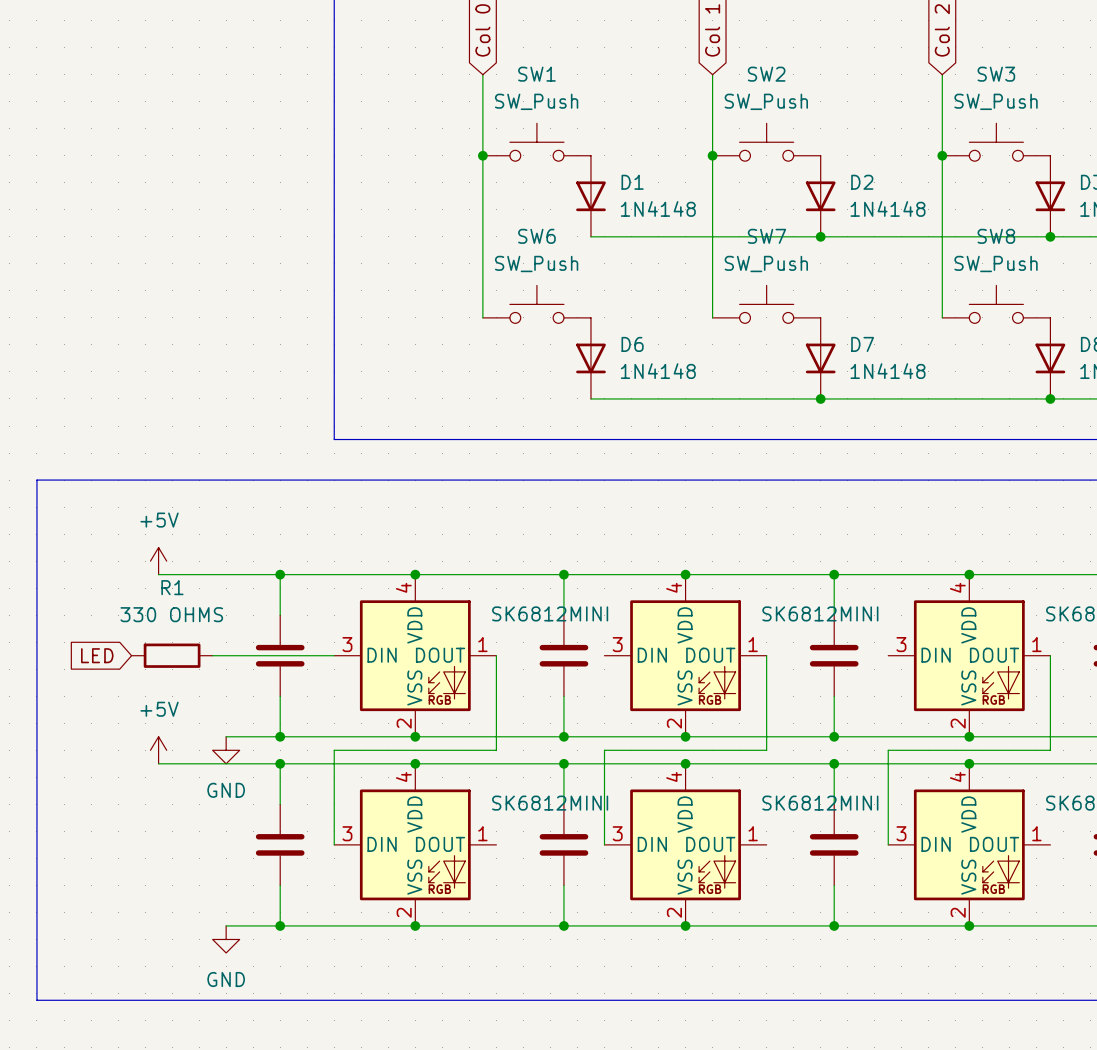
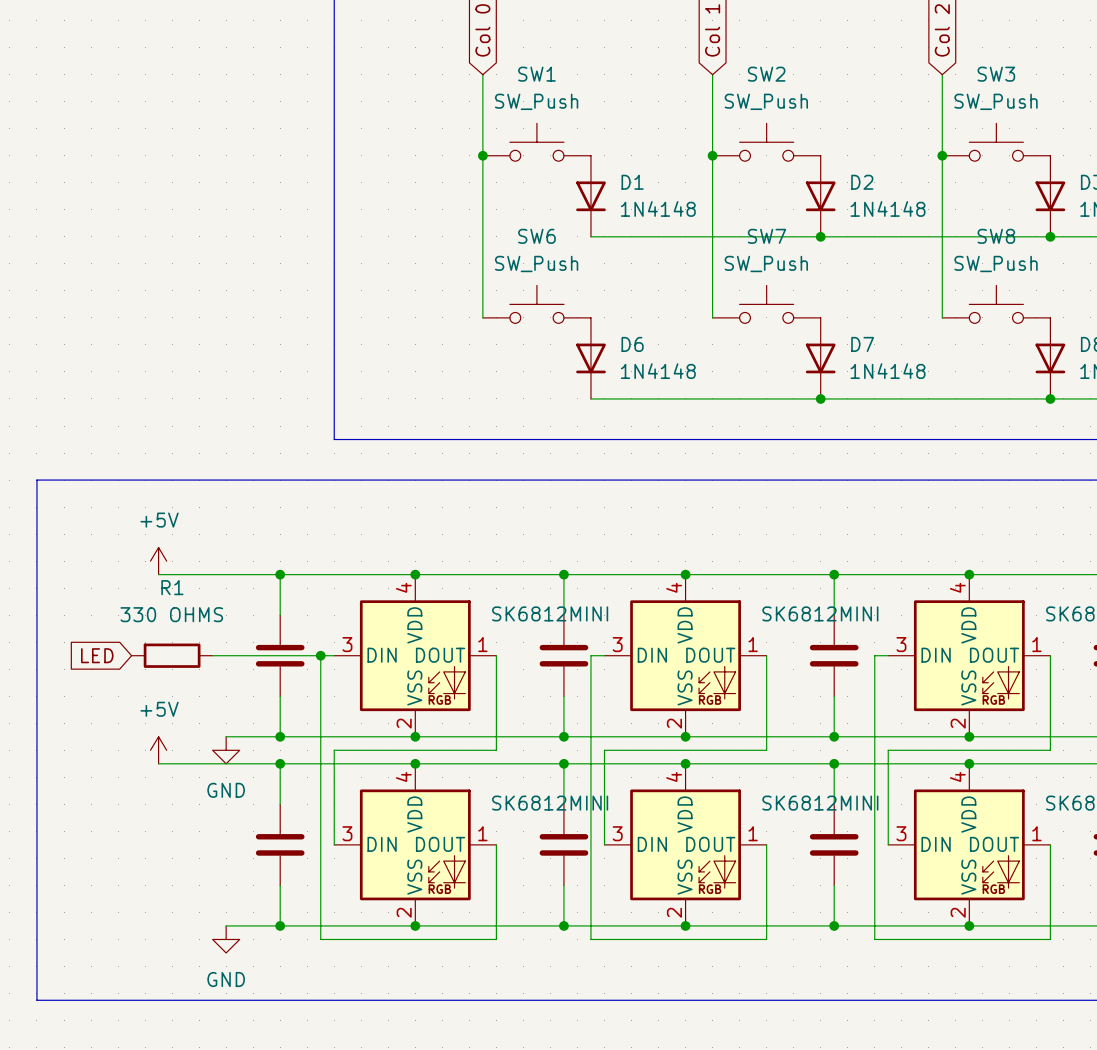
wire: none -> (320, 655) (320, 939) (496, 939) (496, 844)
junction: none -> (320, 655)
wire: none -> (604, 655) (590, 655) (590, 939) (766, 939) (766, 844)
wire: none -> (888, 655) (874, 655) (874, 939) (1050, 939) (1050, 844)

